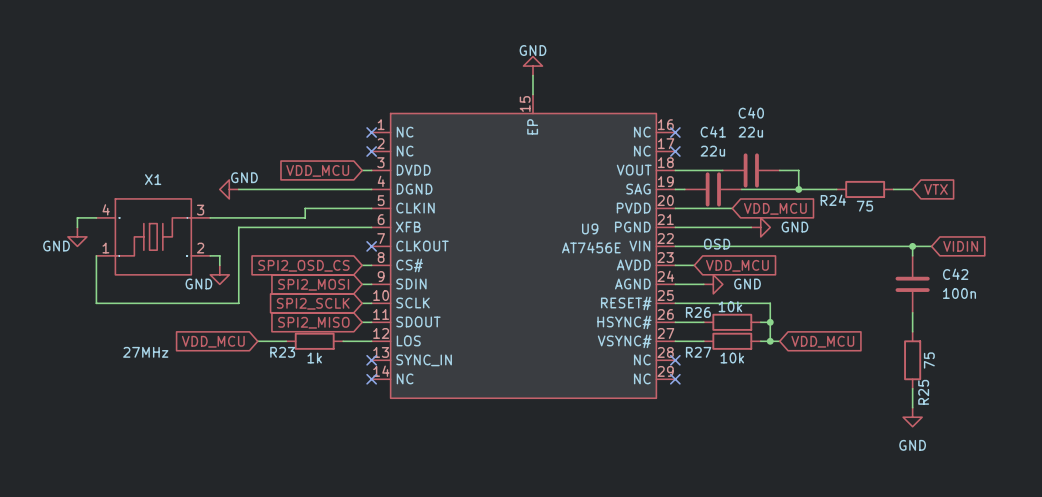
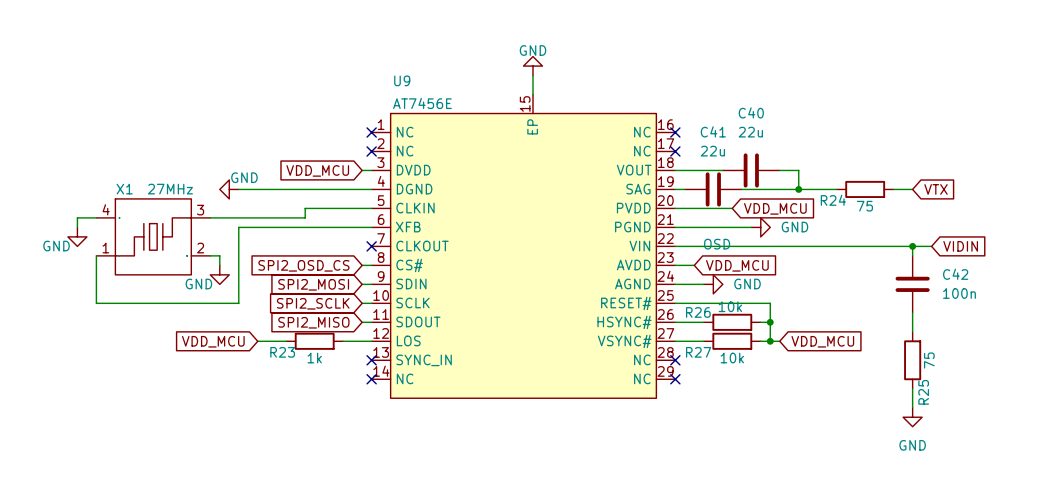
X1 name position: X1 (153, 179) -> X1 (124, 189)
U9 name position: U9 (590, 228) -> U9 (402, 80)
U9 value position: AT7456E (591, 247) -> AT7456E (422, 103)
X1 value position: 27MHz (145, 352) -> 27MHz (170, 189)

